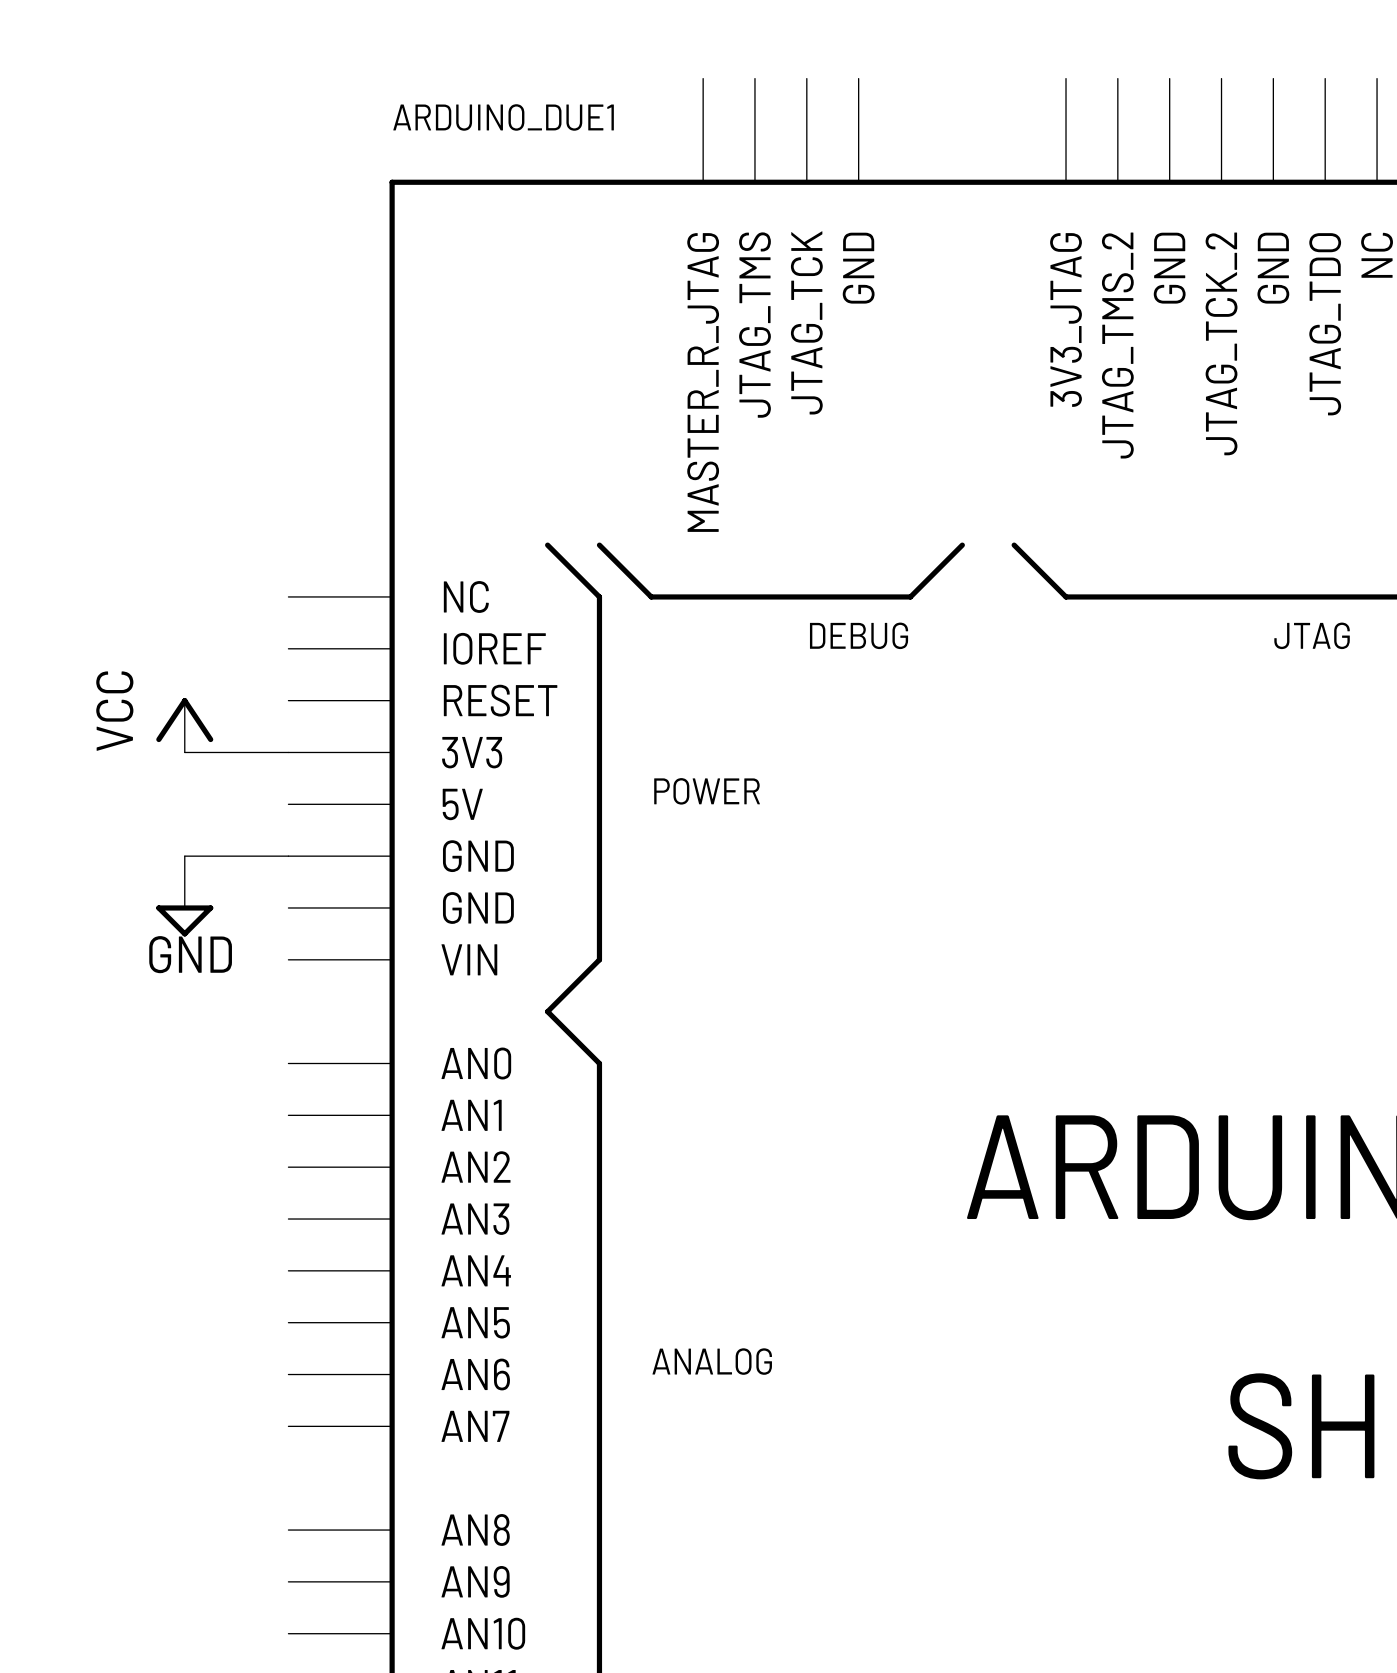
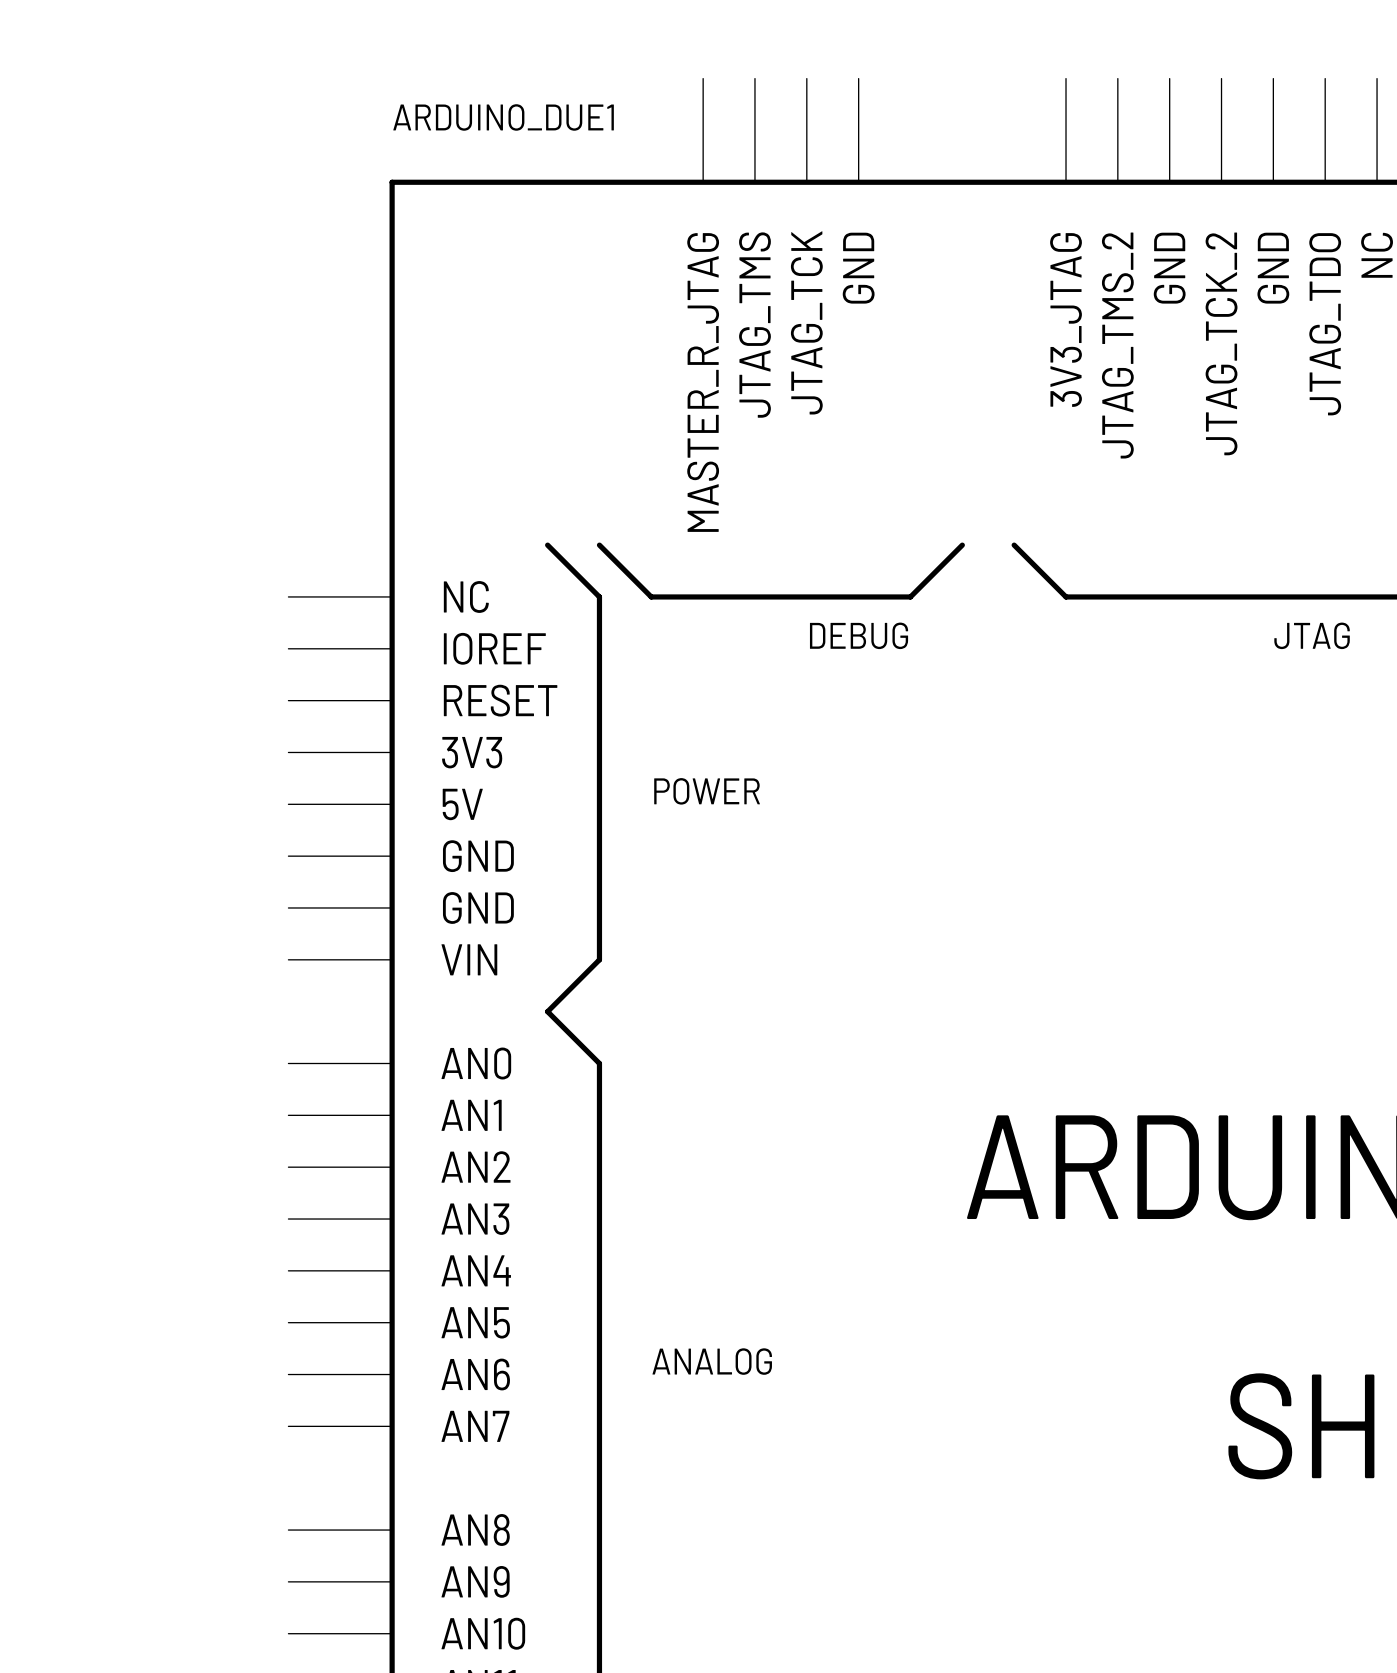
power symbol: VCC (184, 725) -> none
wire: (184, 752) (288, 752) -> none
wire: (184, 856) (288, 856) -> none
power symbol: GND (184, 896) -> none

